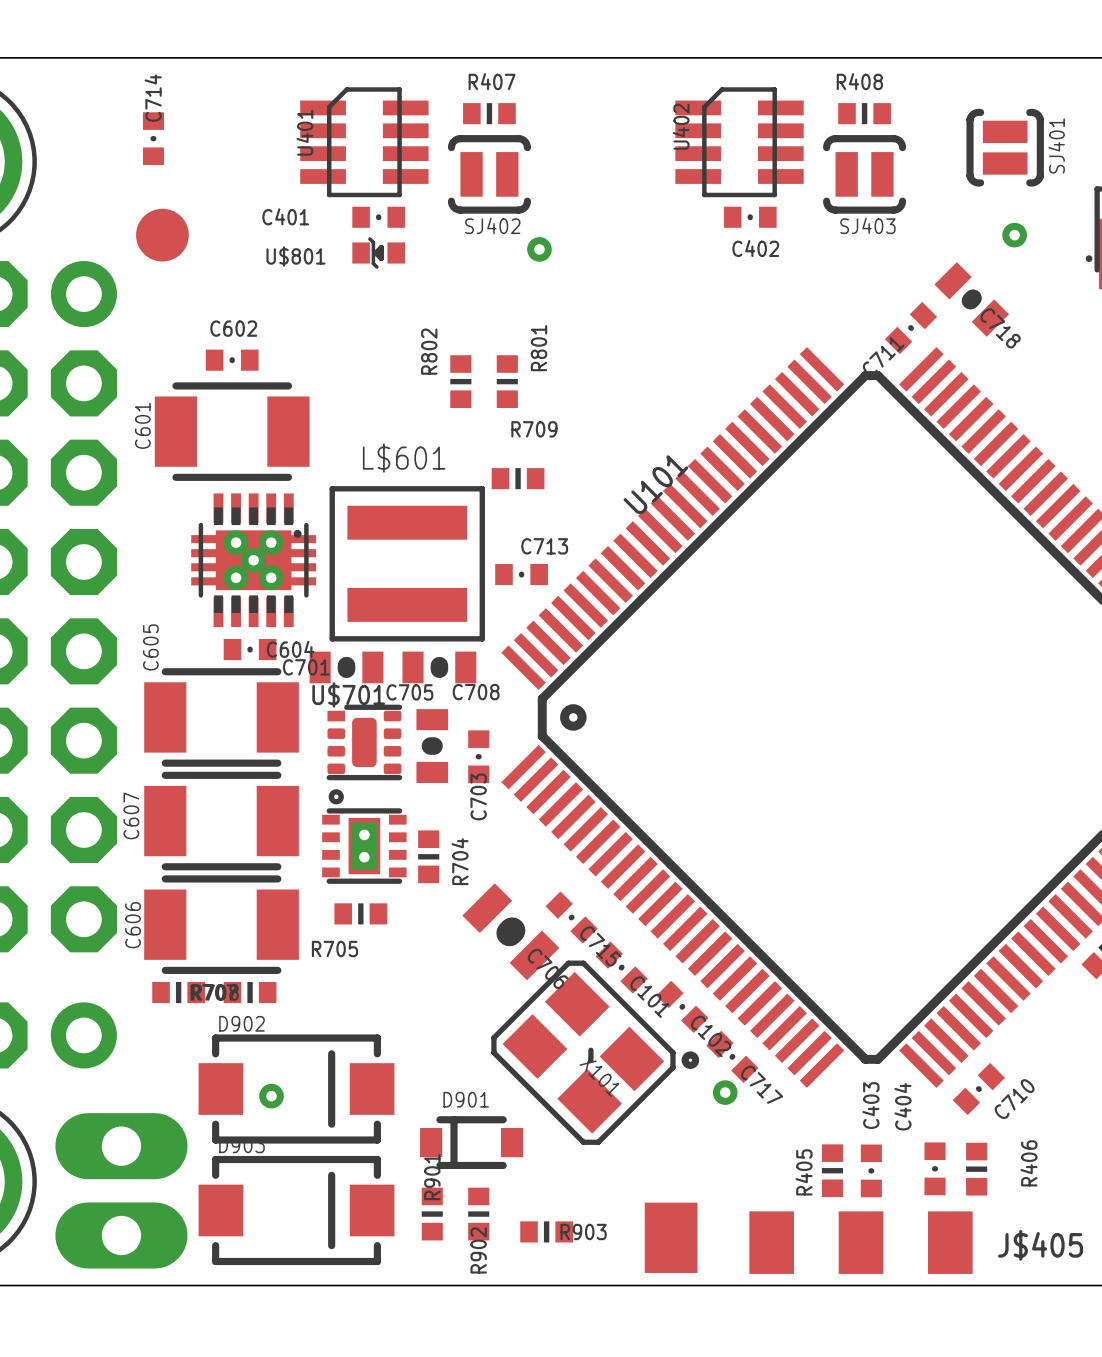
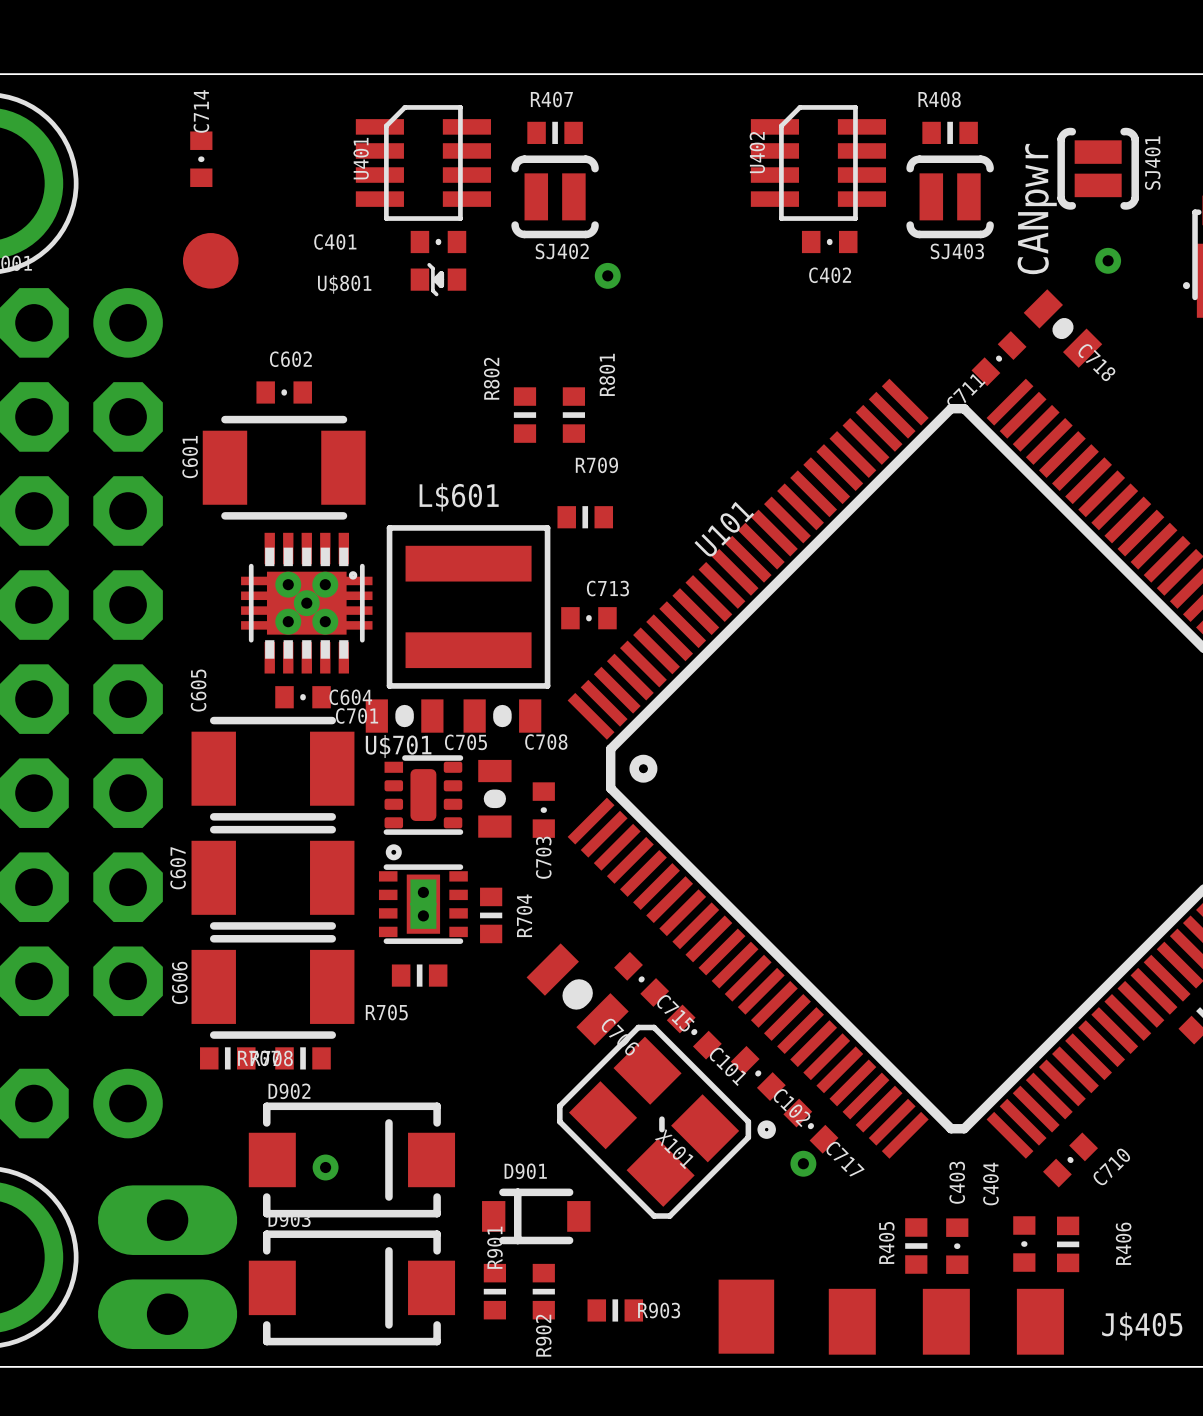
text: none -> CANpwr (1037, 209)

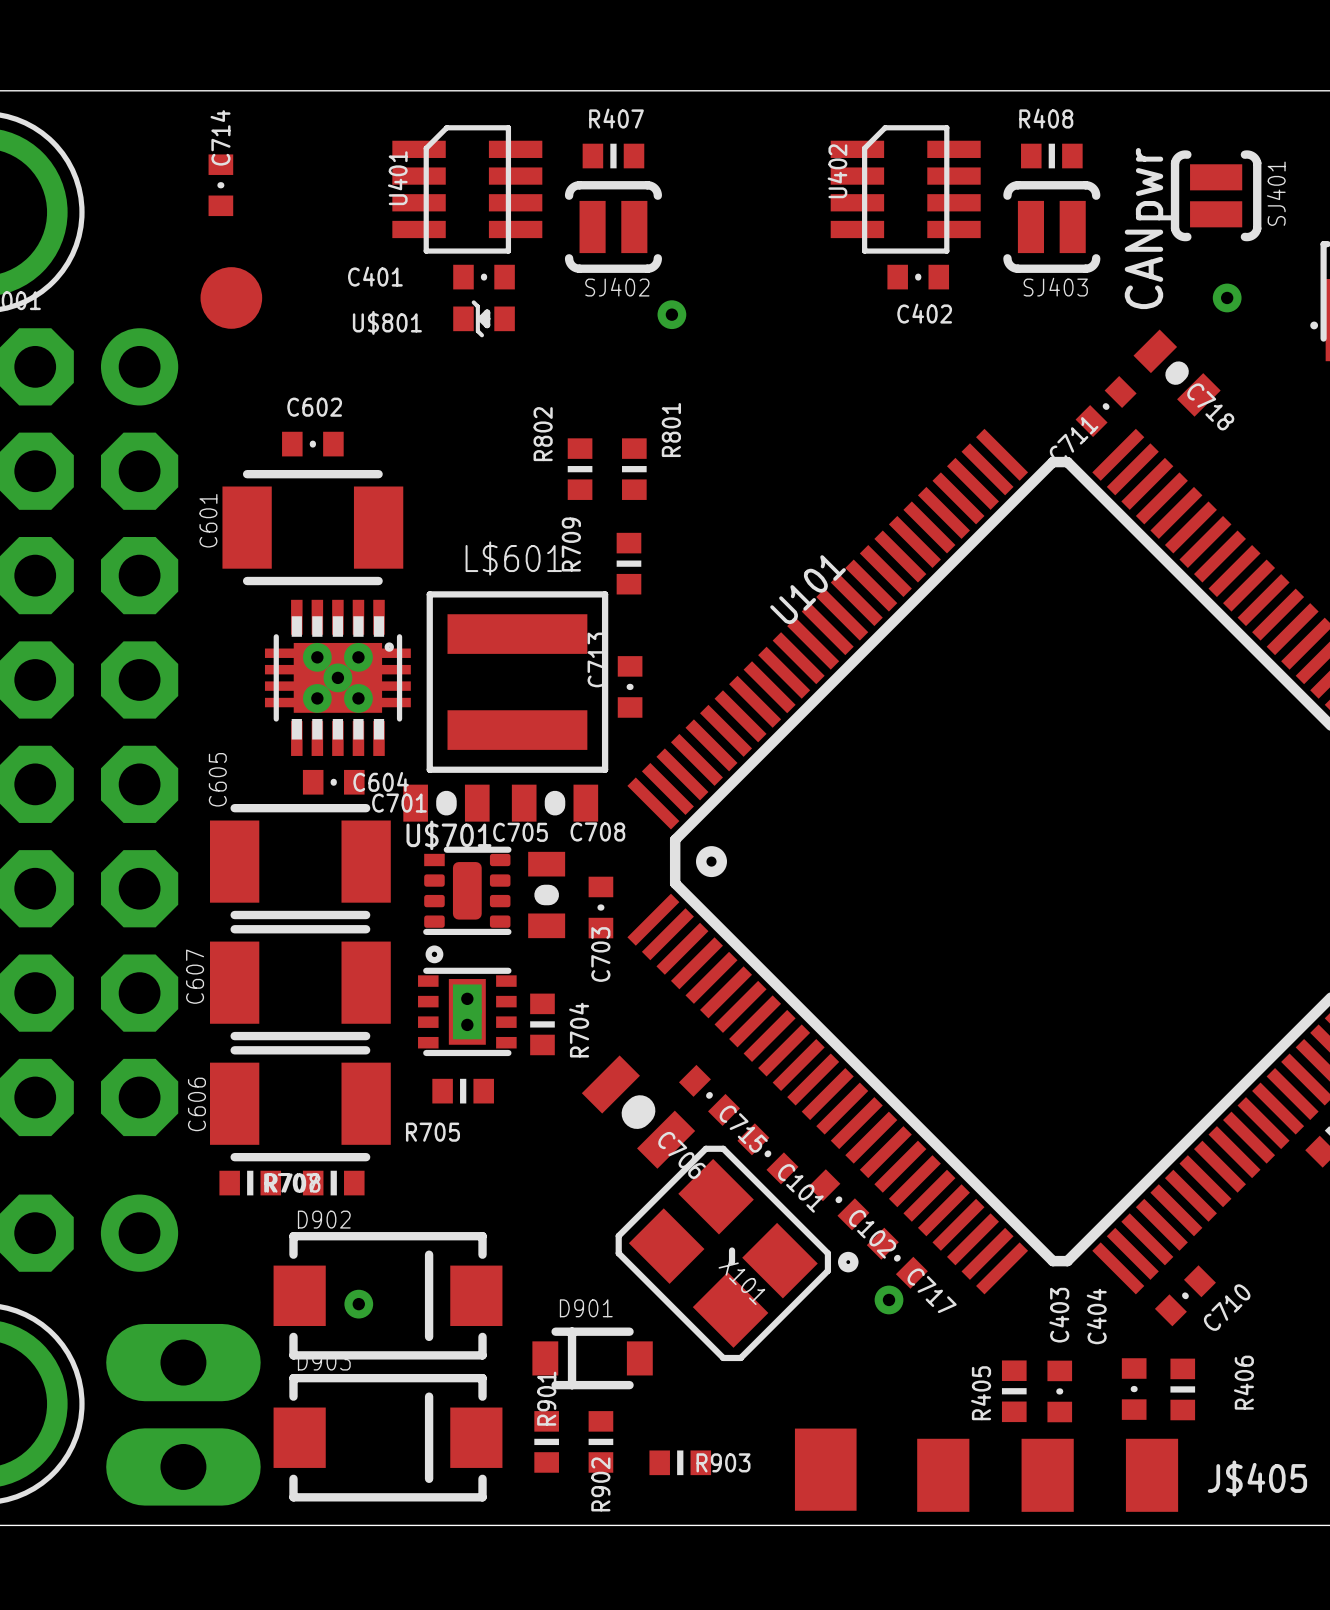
R709 name position: R709 (596, 465) -> R709 (571, 544)
R709 rotation: 0° (585, 517) -> 90° clockwise (628, 563)
C713 rotation: 0° (588, 618) -> 90° clockwise (630, 686)

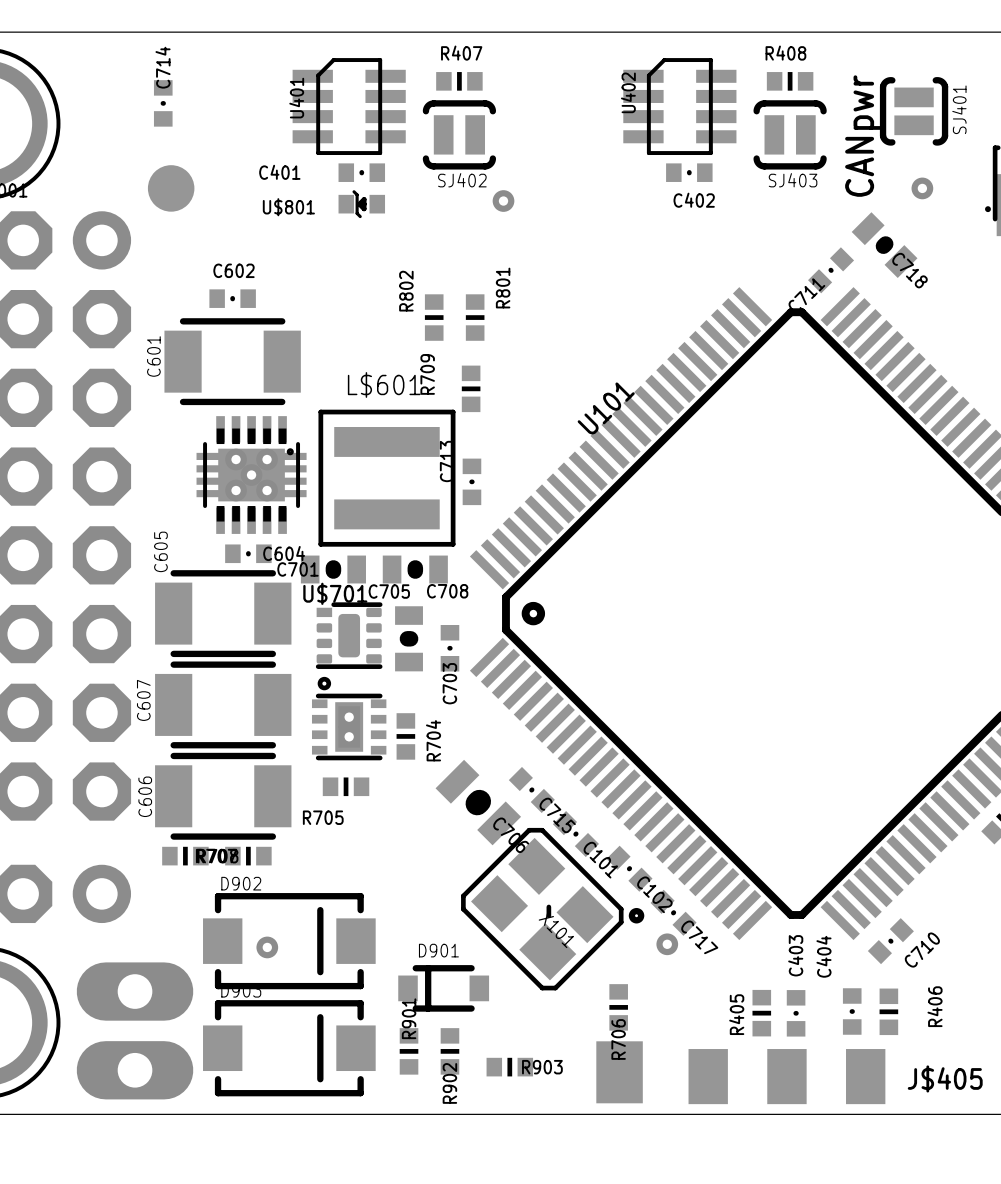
R706: none -> (618, 1007)

